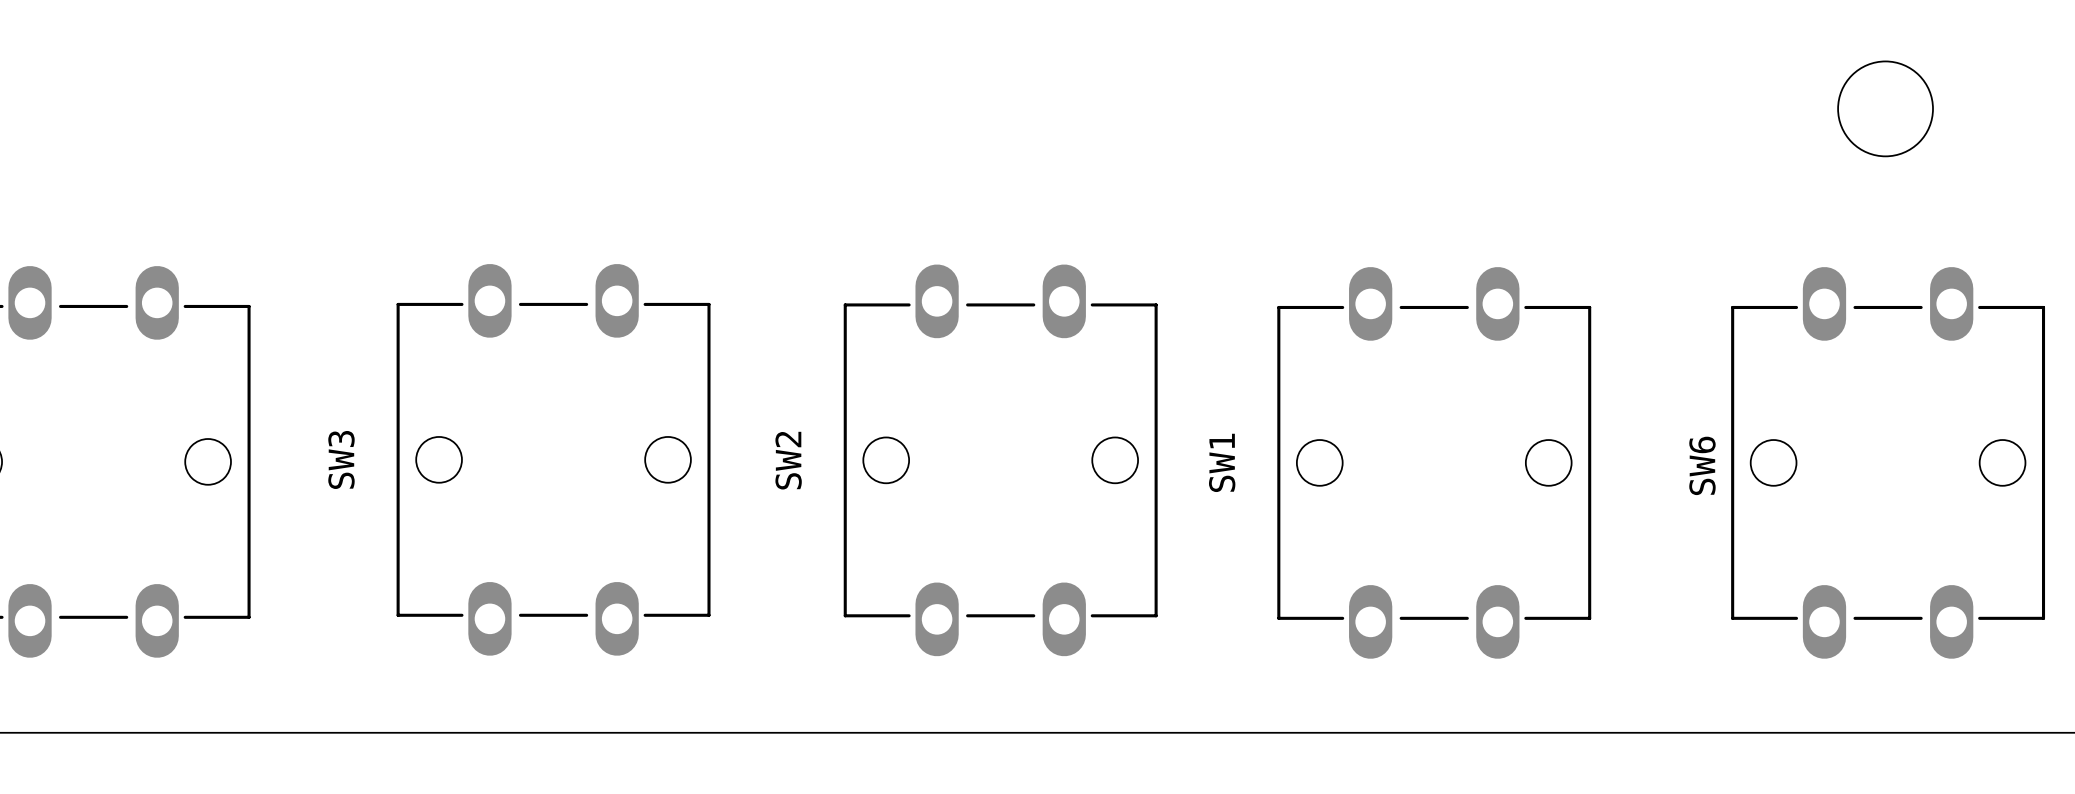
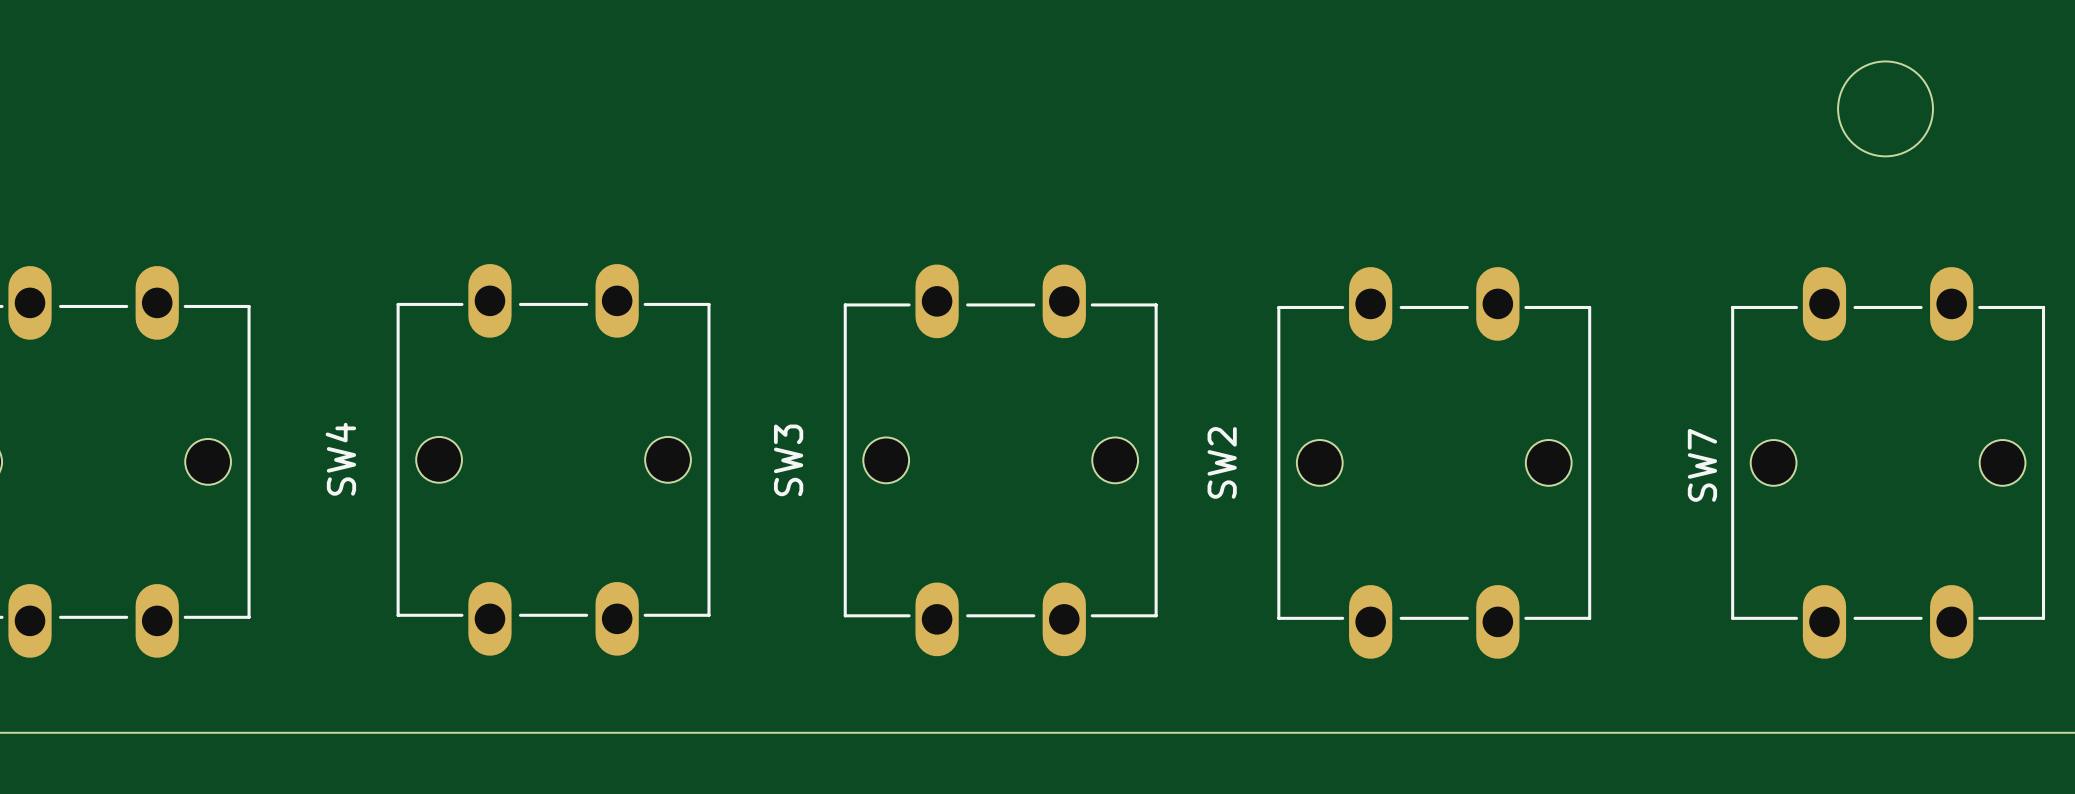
SW3 name: SW3 (341, 459) -> SW4 (340, 459)
SW2 name: SW2 (788, 460) -> SW3 (788, 460)
SW1 name: SW1 (1222, 462) -> SW2 (1222, 462)
SW6 name: SW6 (1702, 465) -> SW7 (1702, 465)

